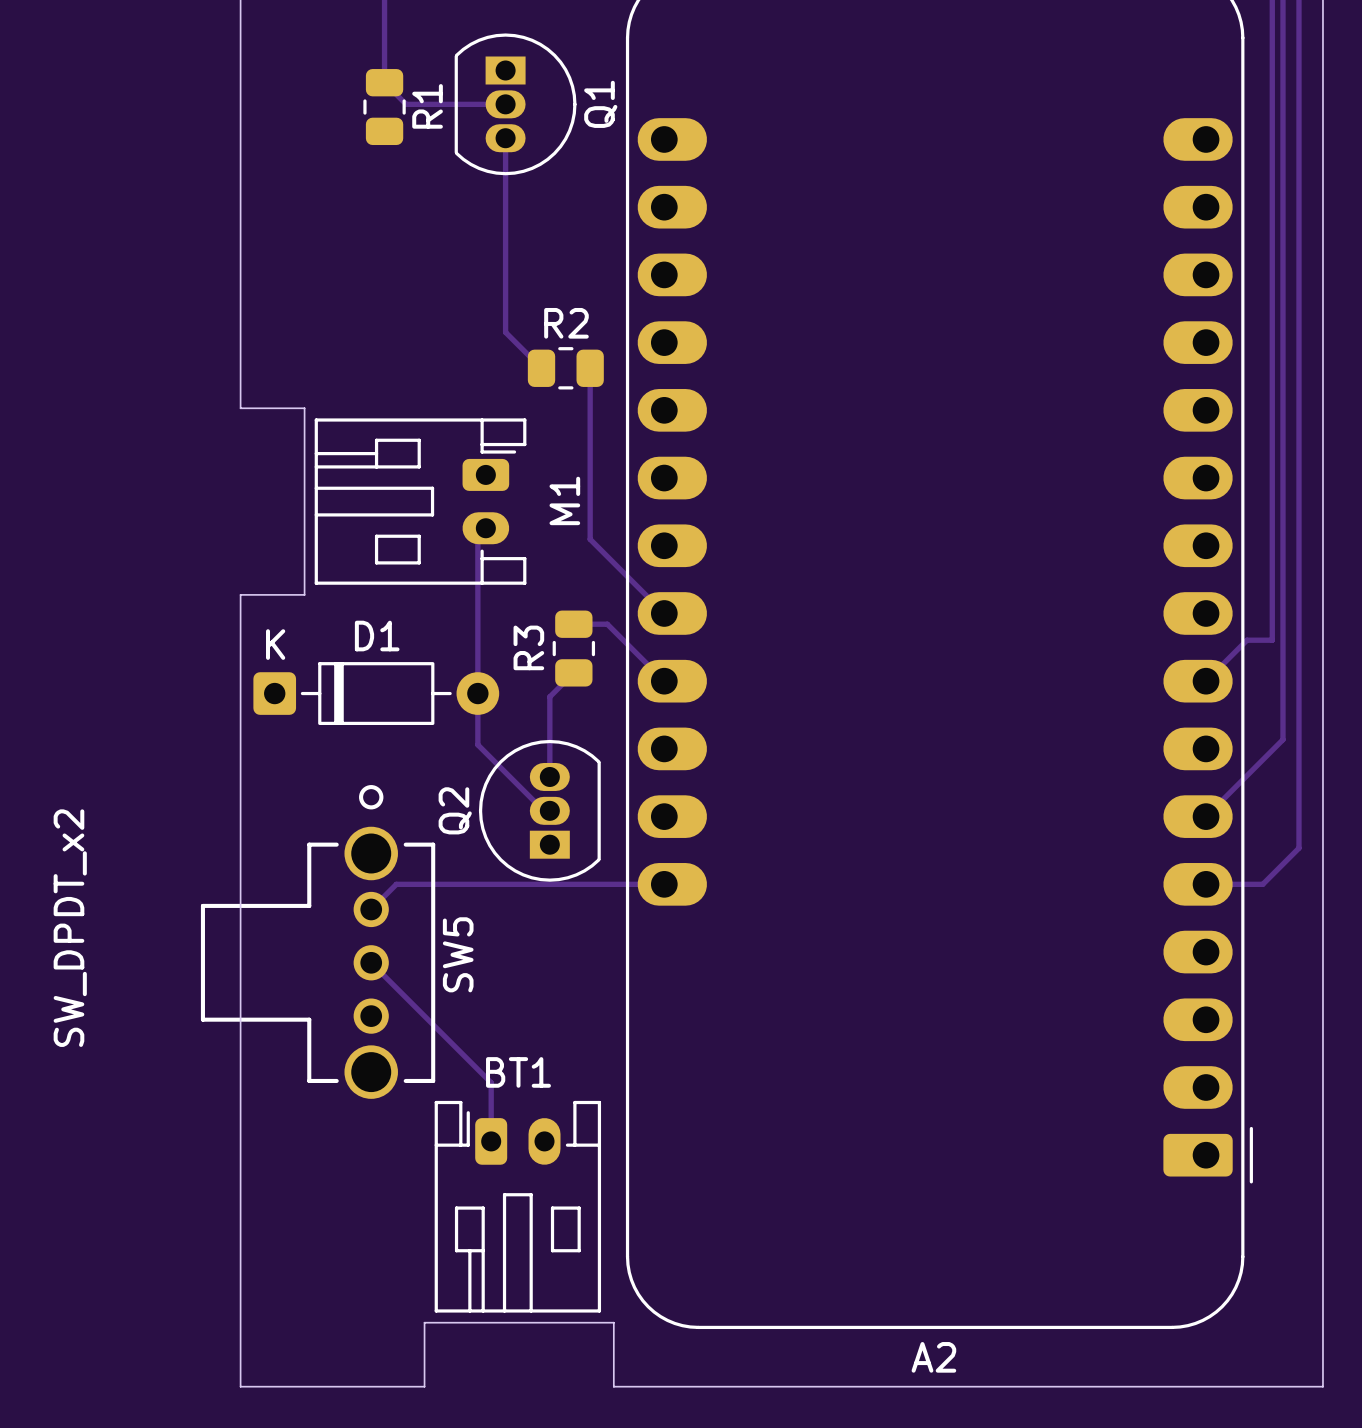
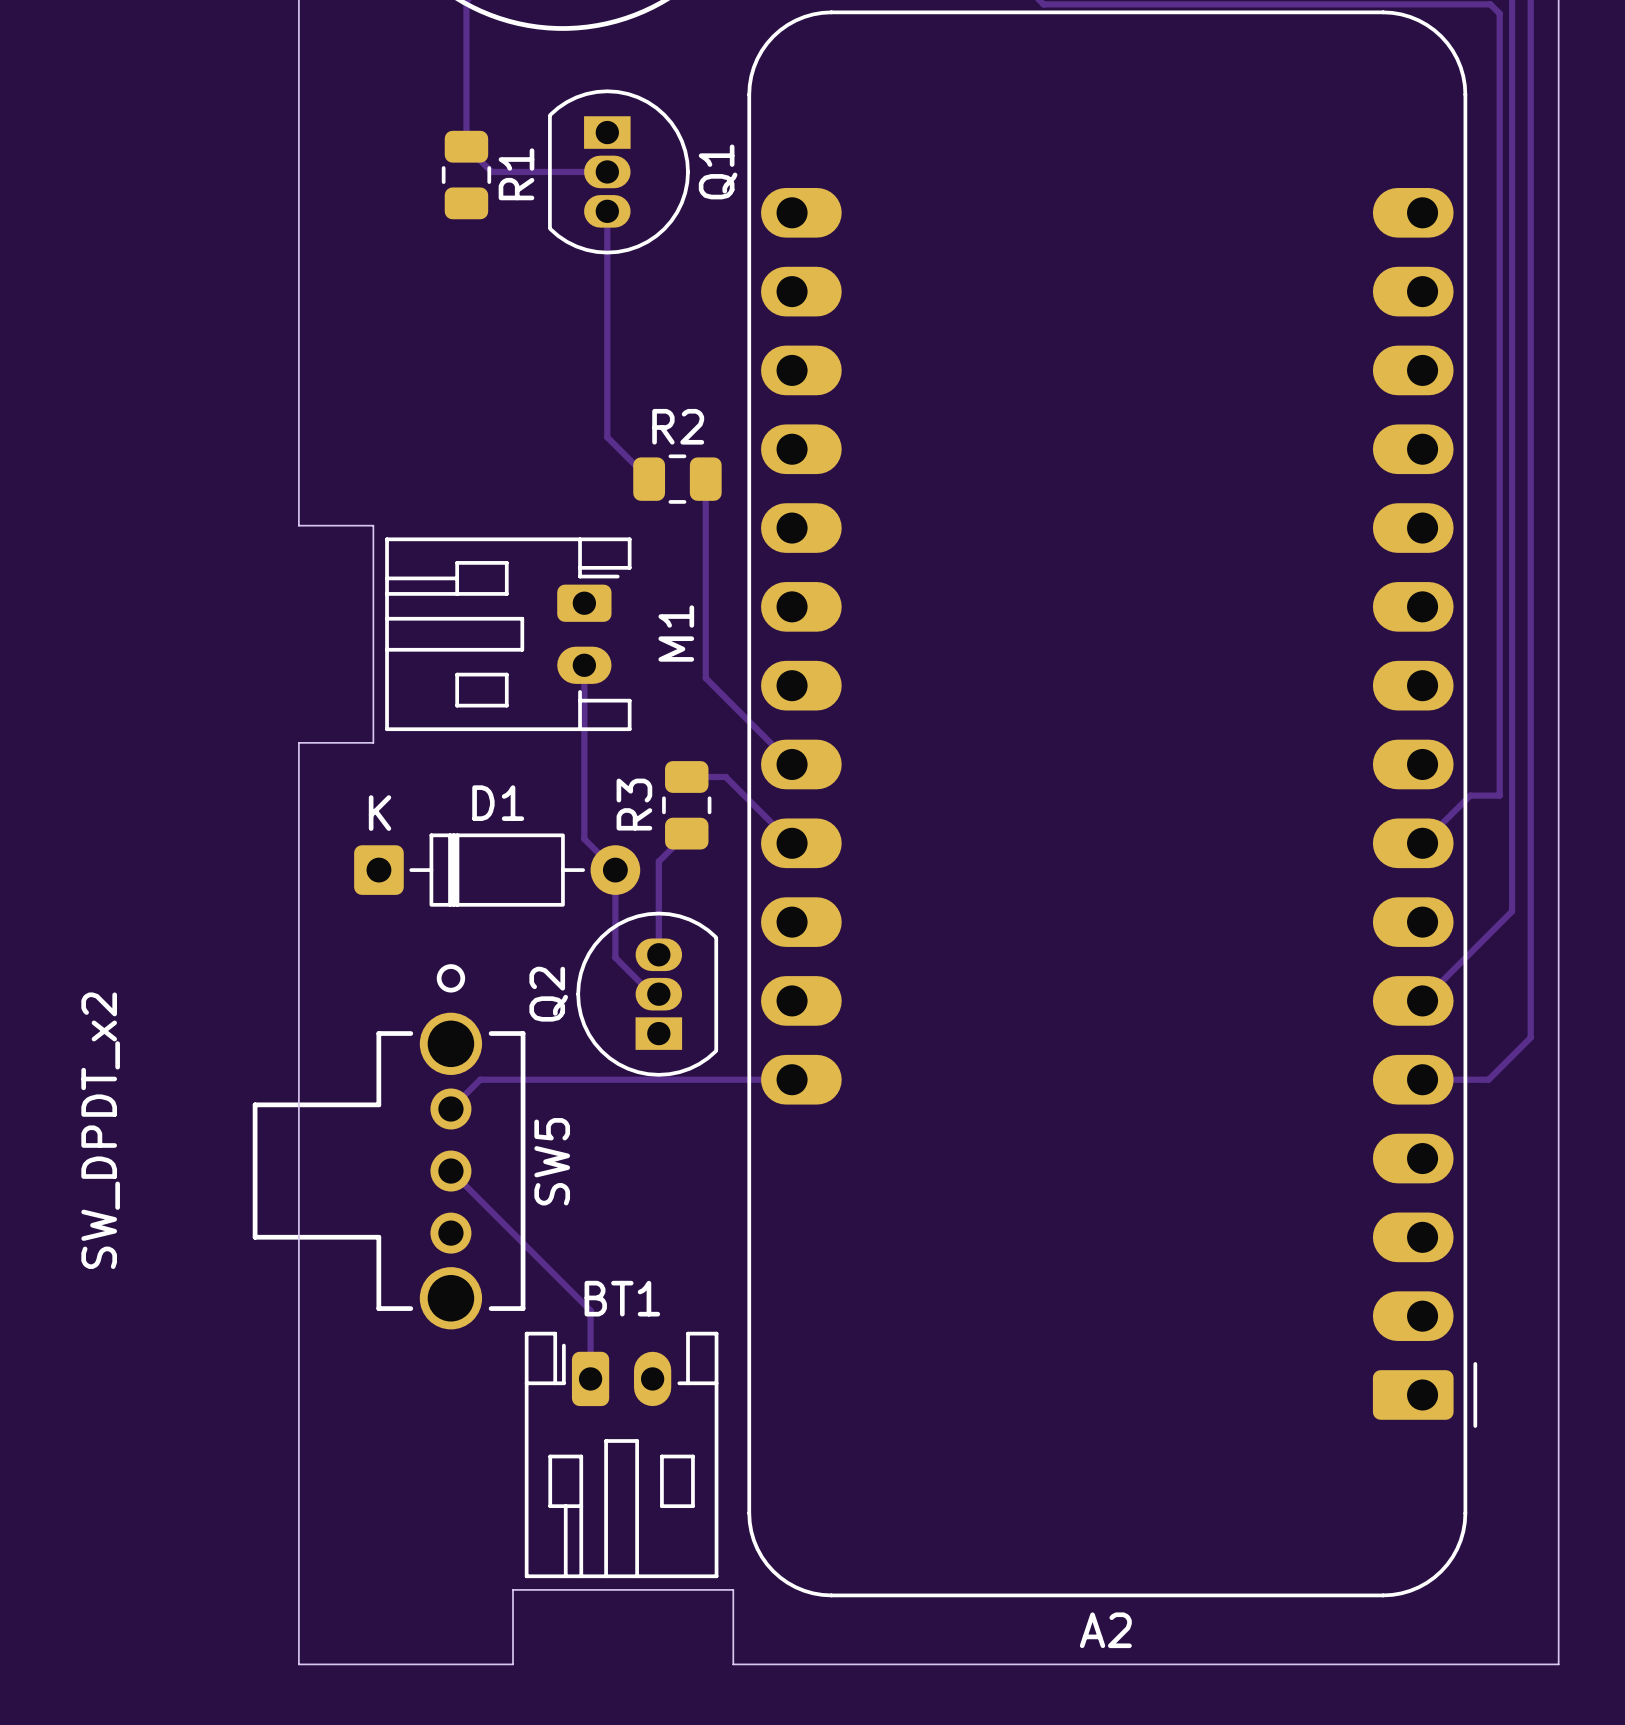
track: (477, 536) (477, 744) (512, 779) -> (584, 665) (584, 839) (615, 870) (615, 957)
D1 position: (376, 693) -> (497, 870)

